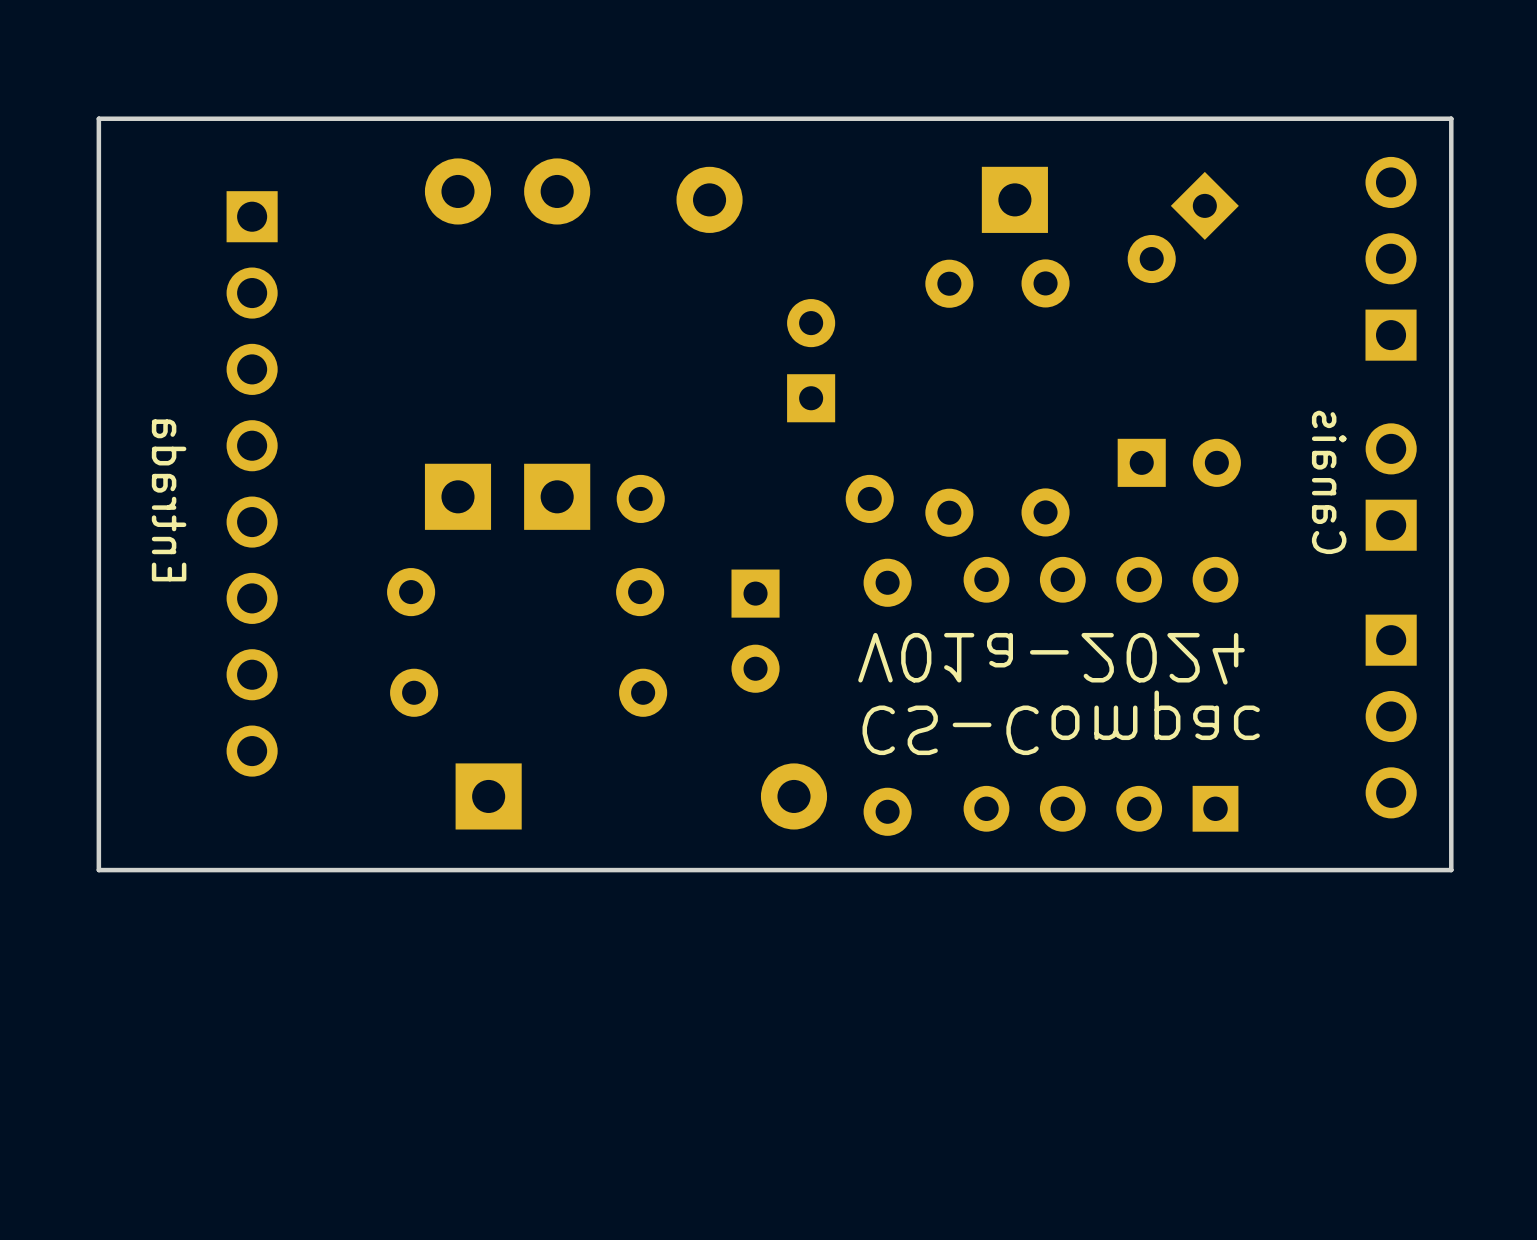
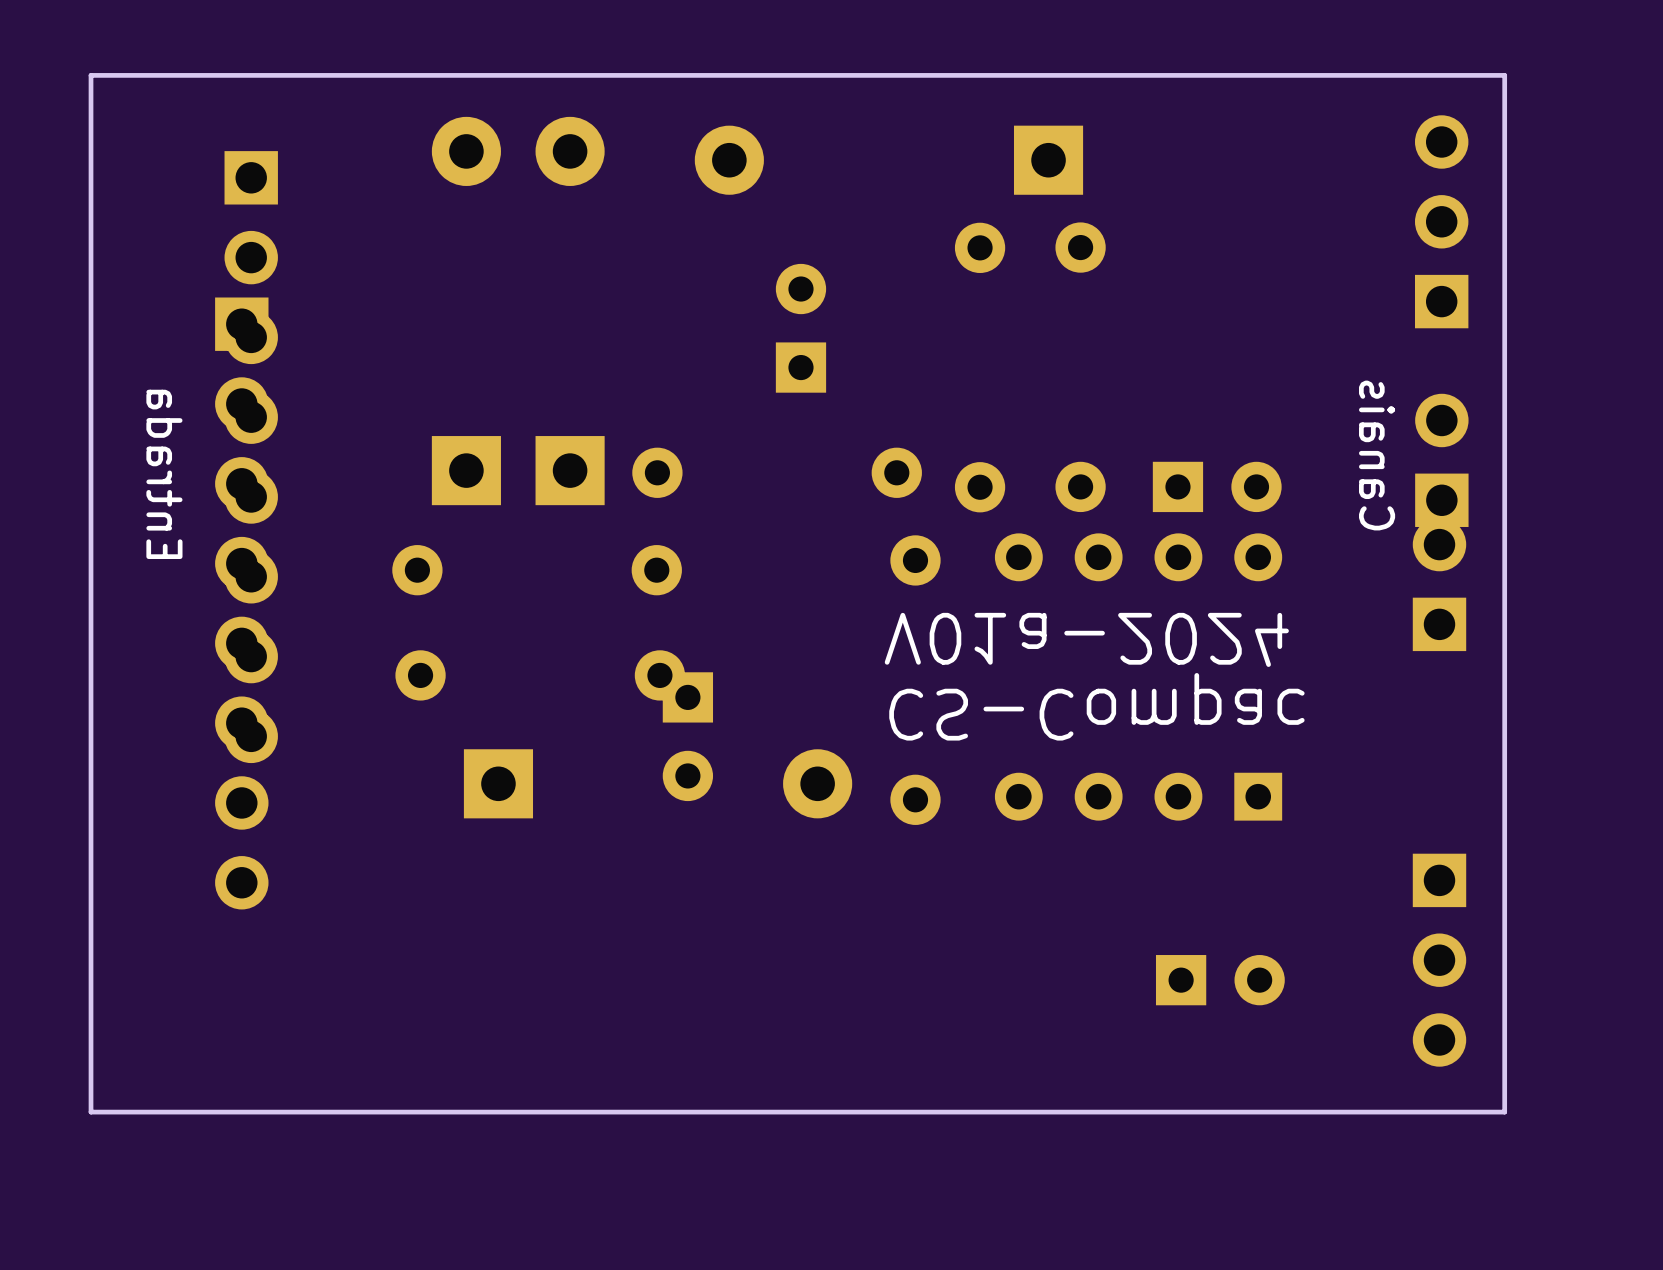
part: (1183, 227) -> none
part position: (811, 360) -> (800, 328)
part position: (1179, 462) -> (1217, 486)
part: none -> (1439, 584)
part: none -> (241, 603)
part: (755, 631) -> none
part position: (1391, 716) -> (1439, 960)
part: none -> (687, 736)
board edge: (1451, 870) (98, 870) -> (1504, 860) (1504, 1112) (91, 1112) (91, 860)
part: none -> (1220, 980)

